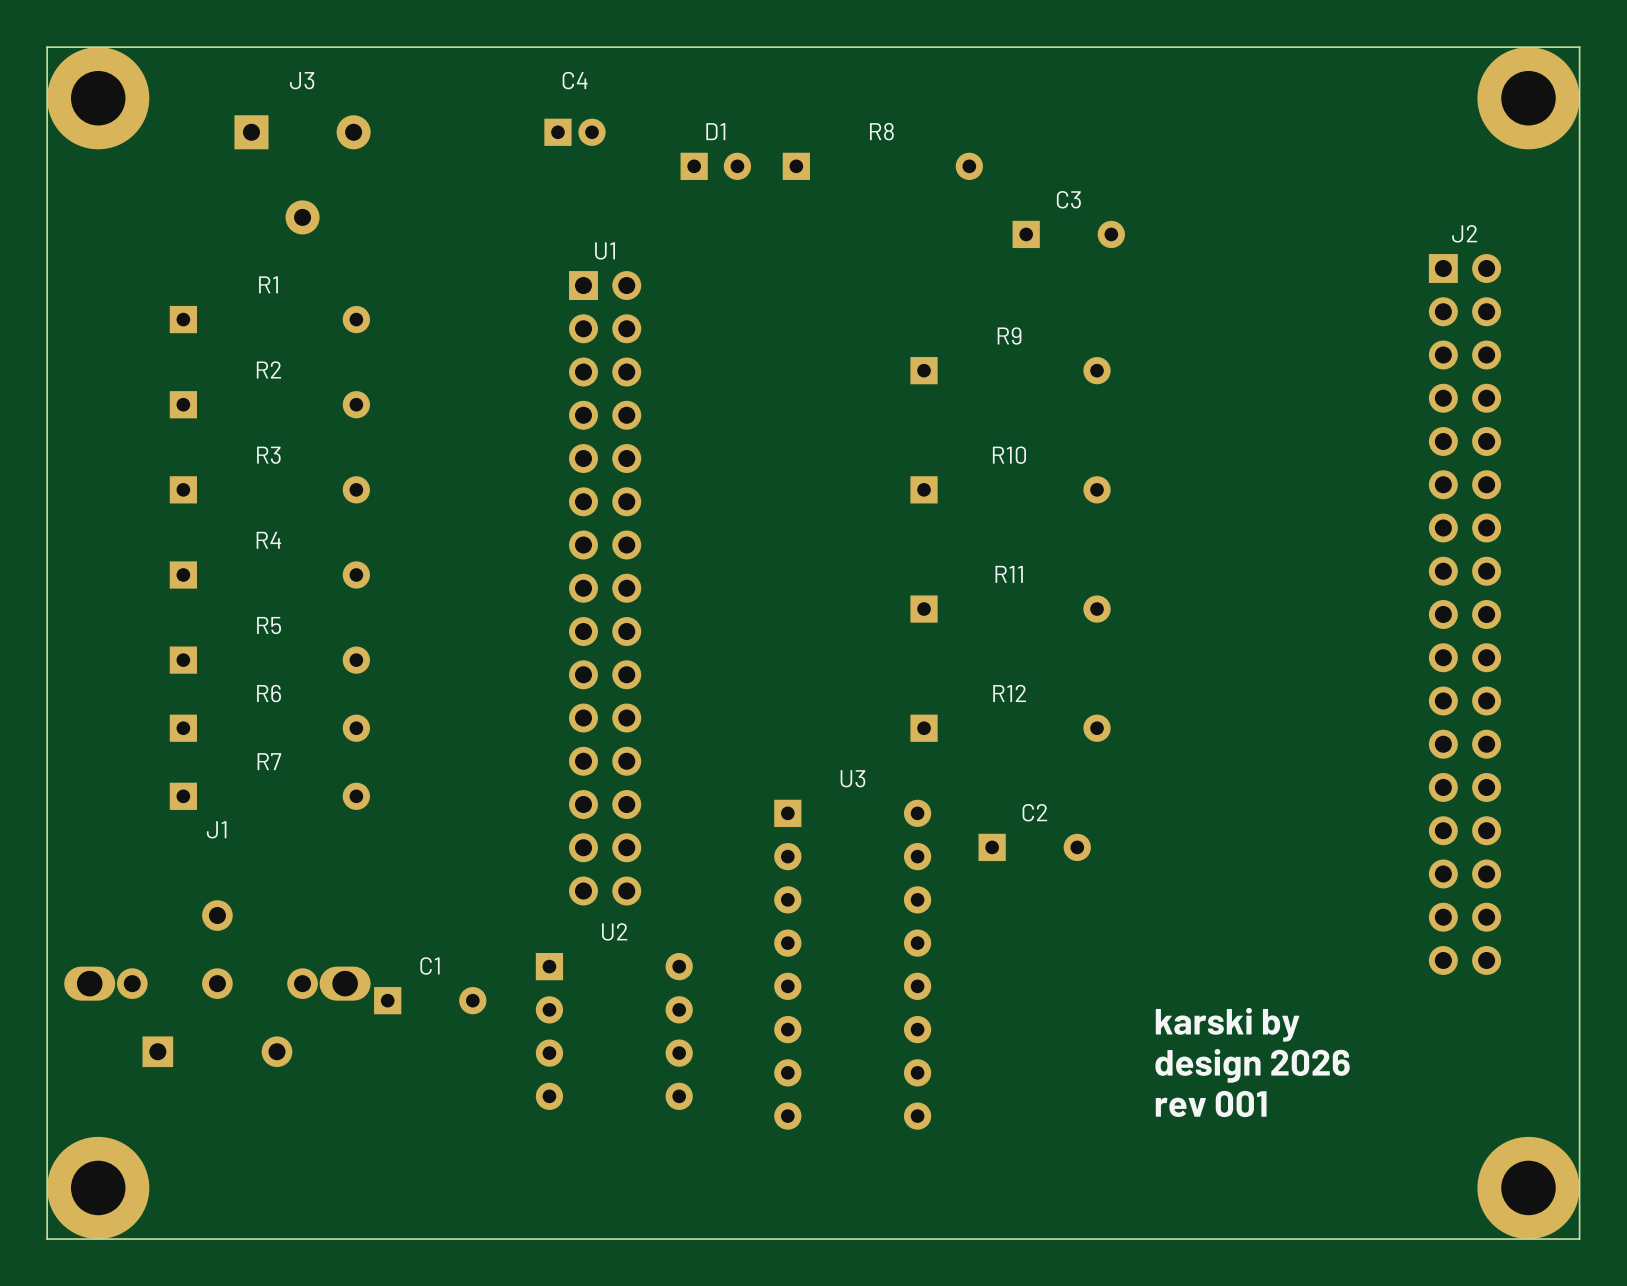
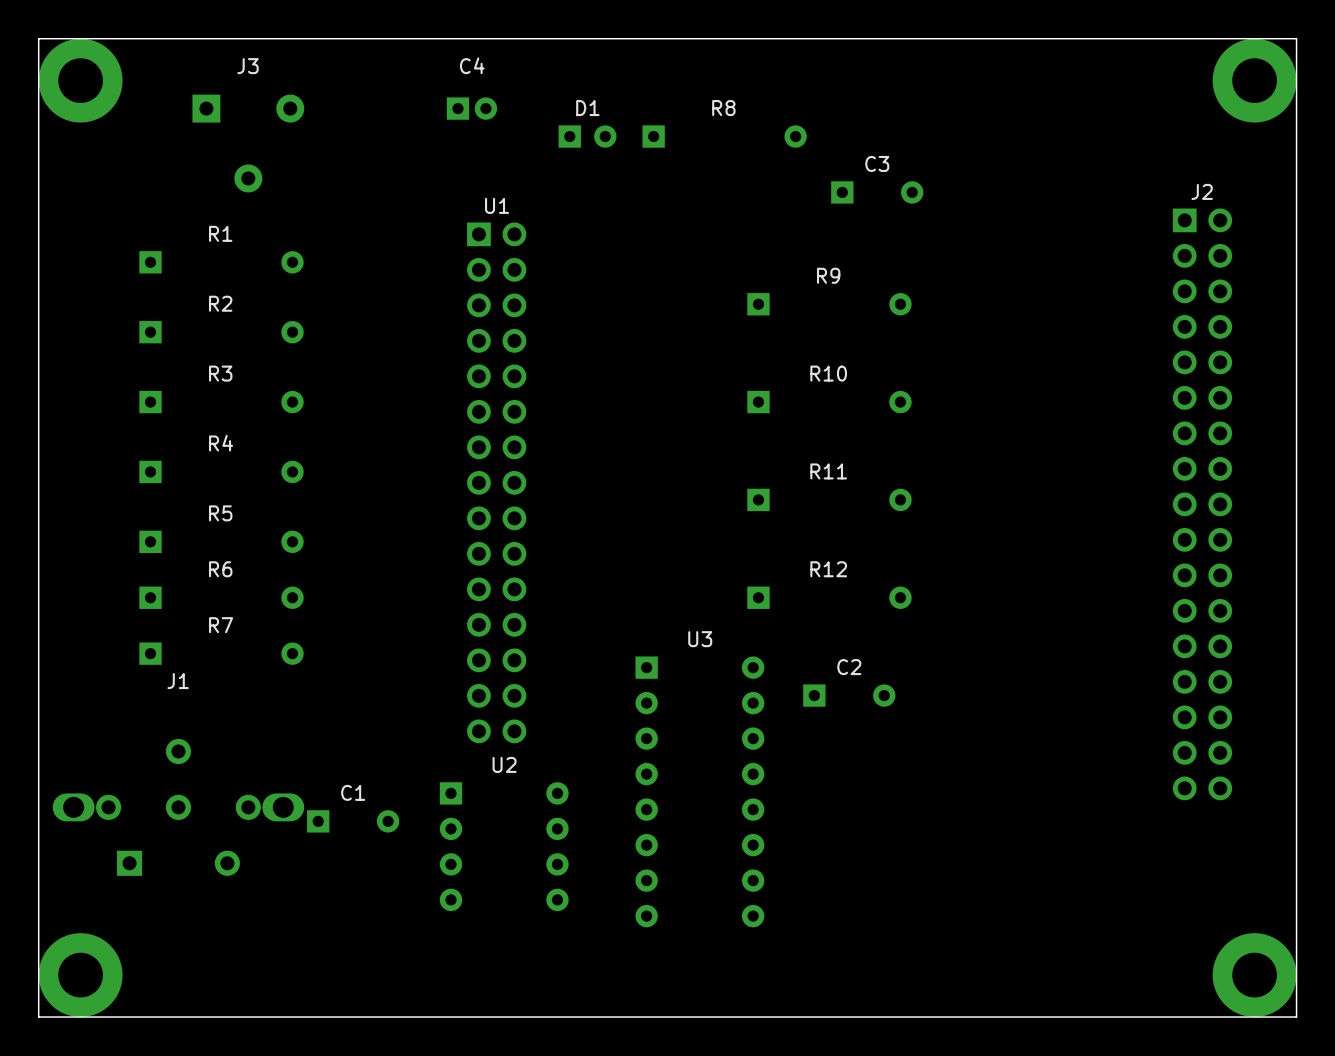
text: karski by (1227, 1024) -> none
text: design 2026 (1252, 1065) -> none
text: rev 001 (1211, 1104) -> none

